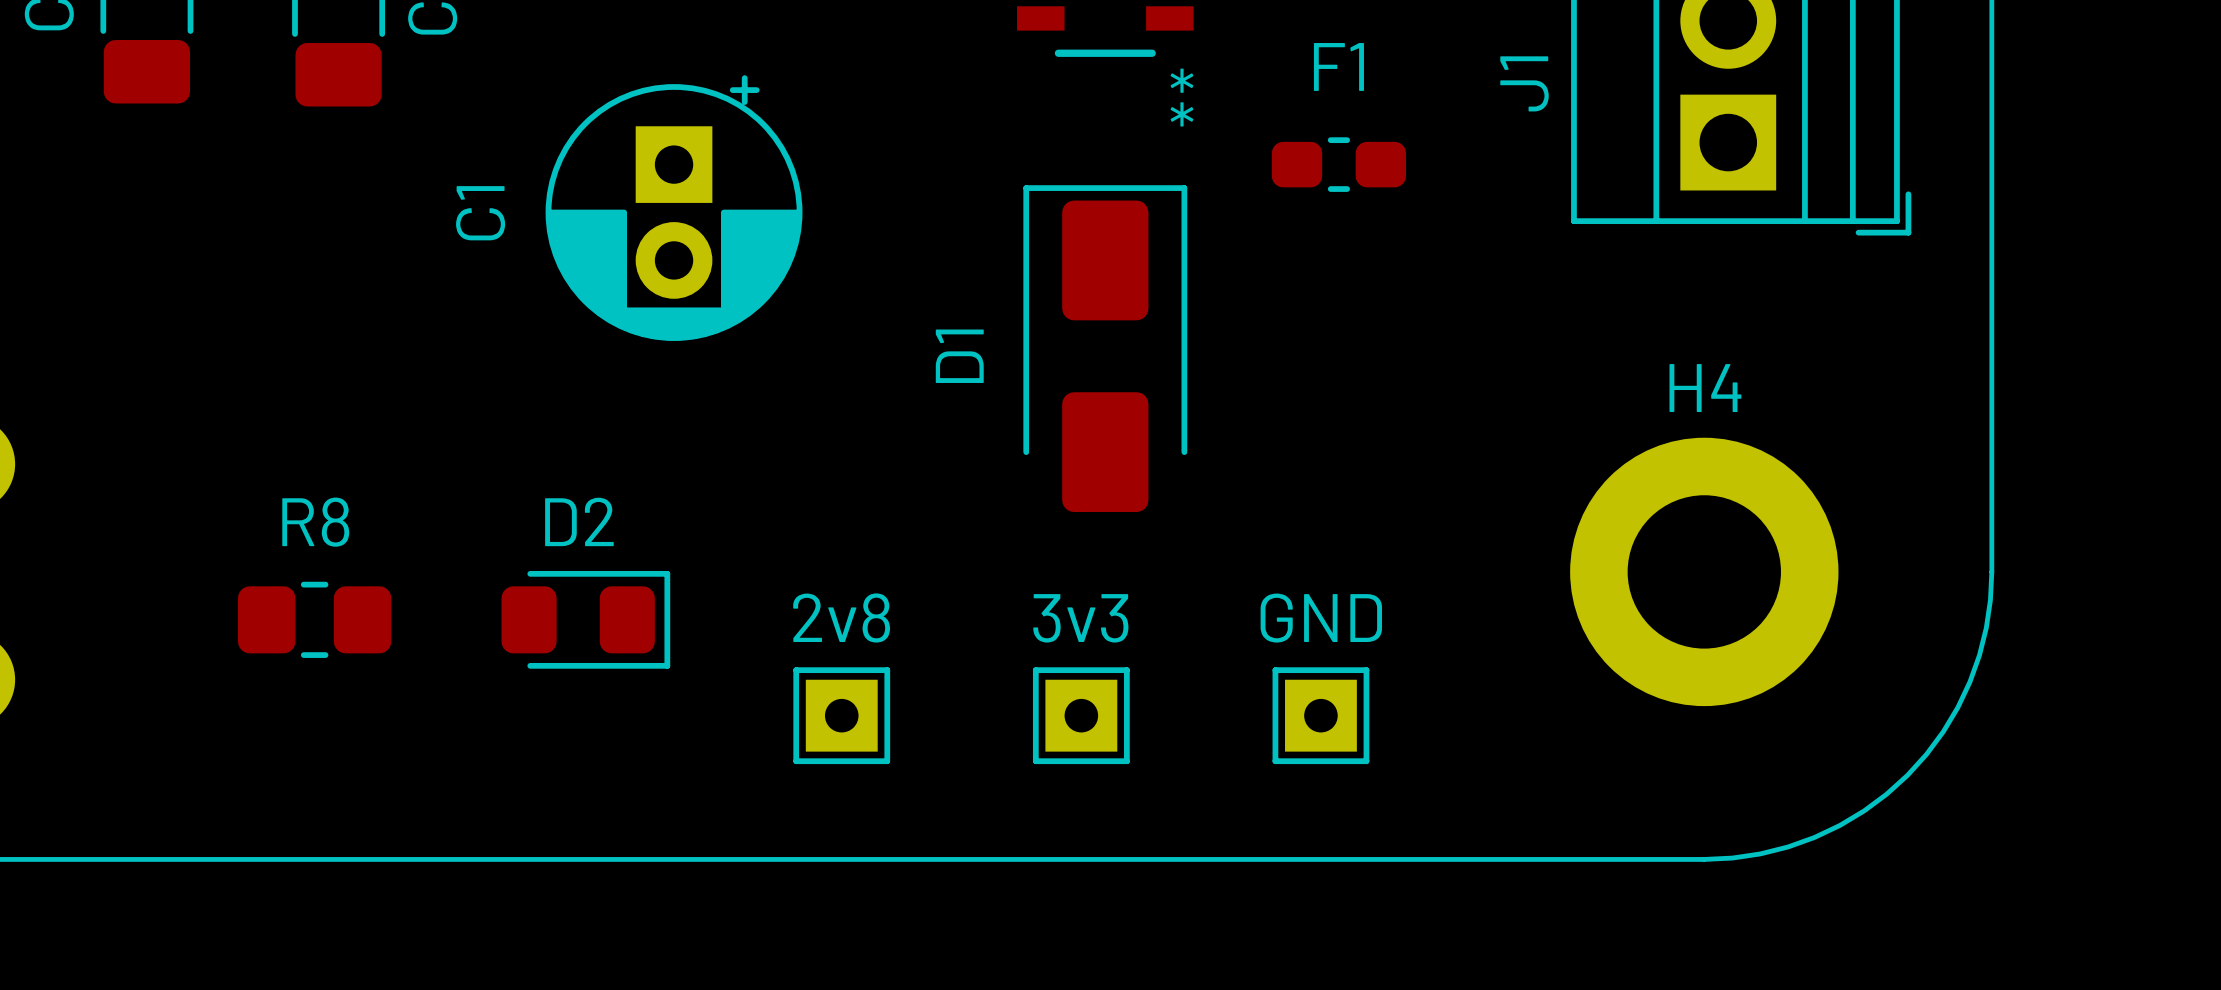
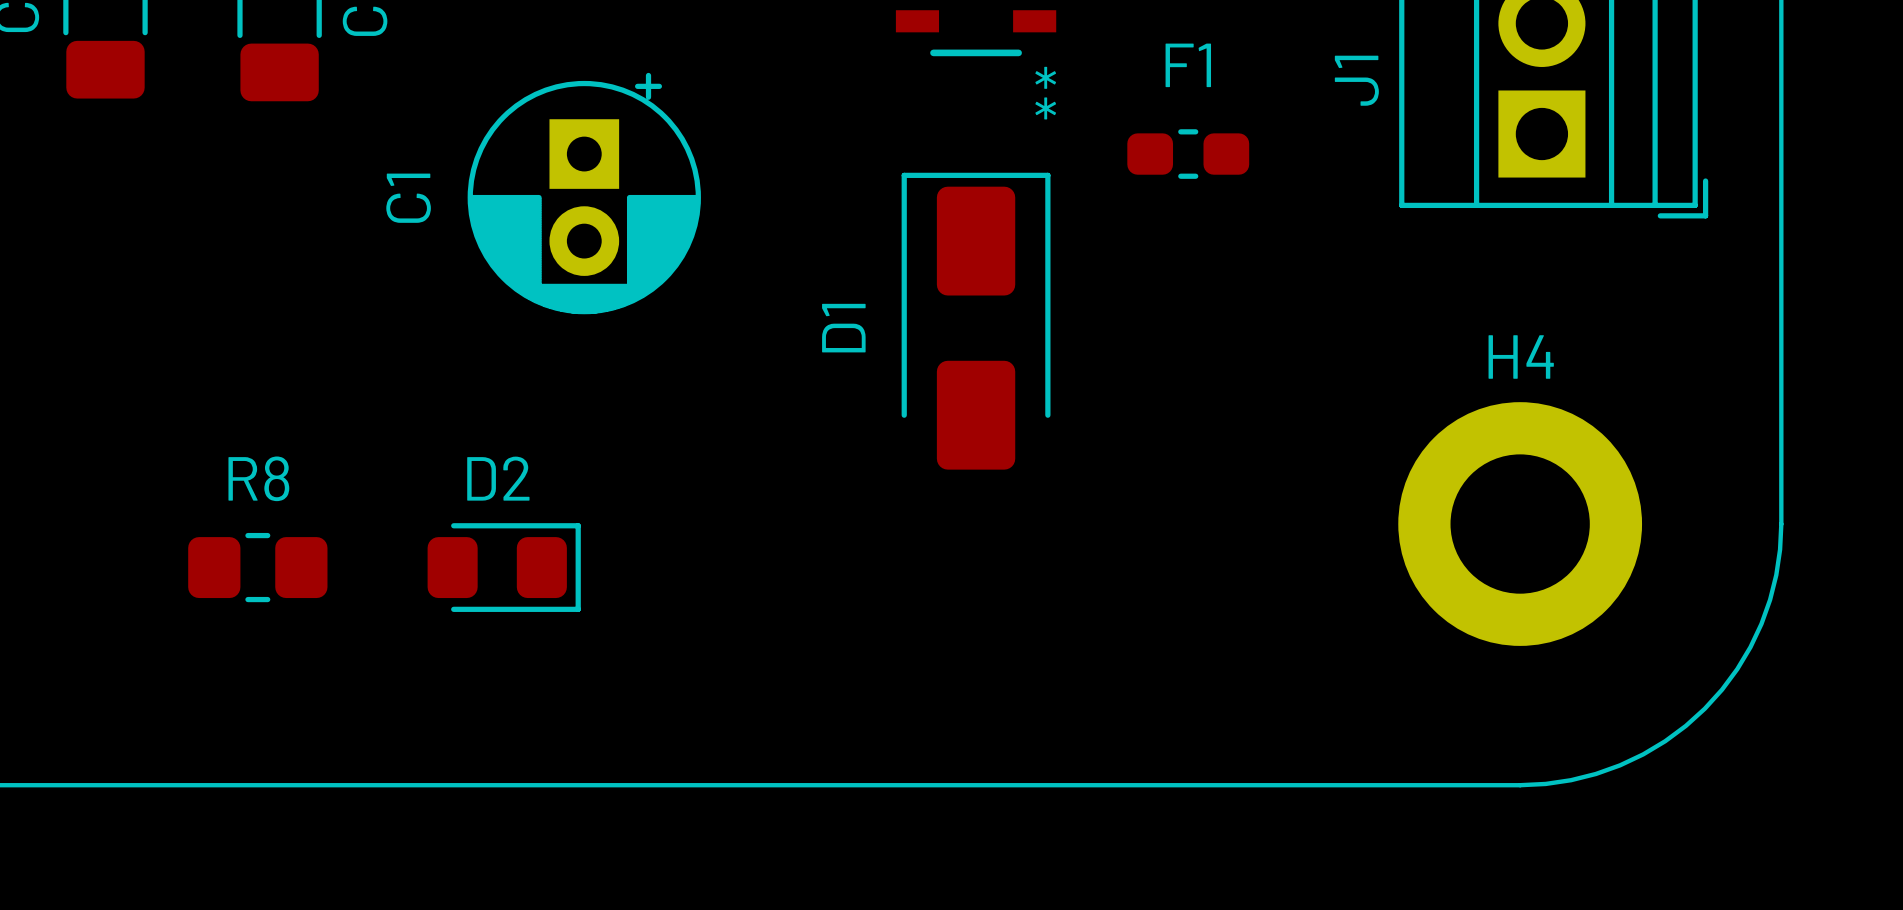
2v8: (841, 715) -> none
3v3: (1081, 715) -> none
GND: (1320, 715) -> none

